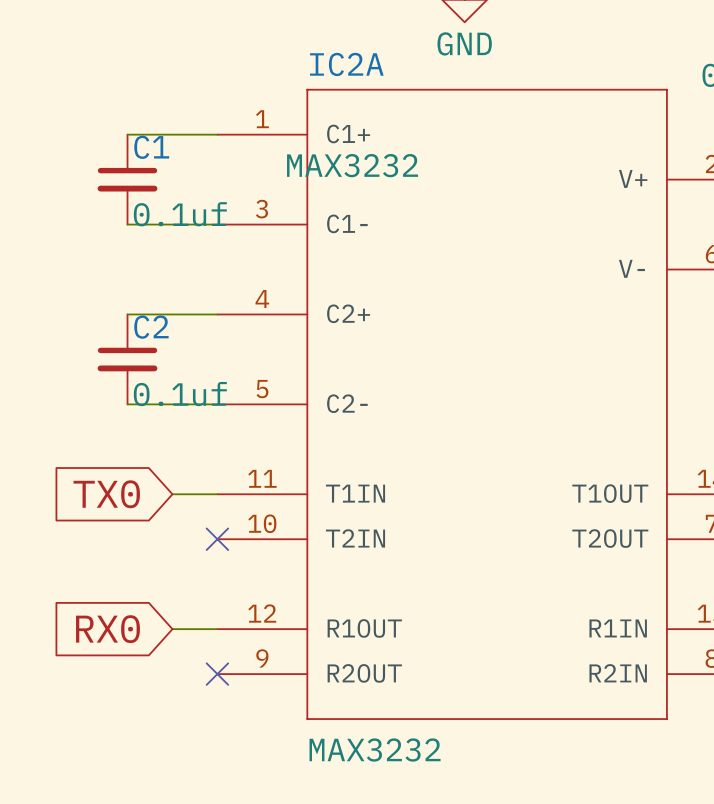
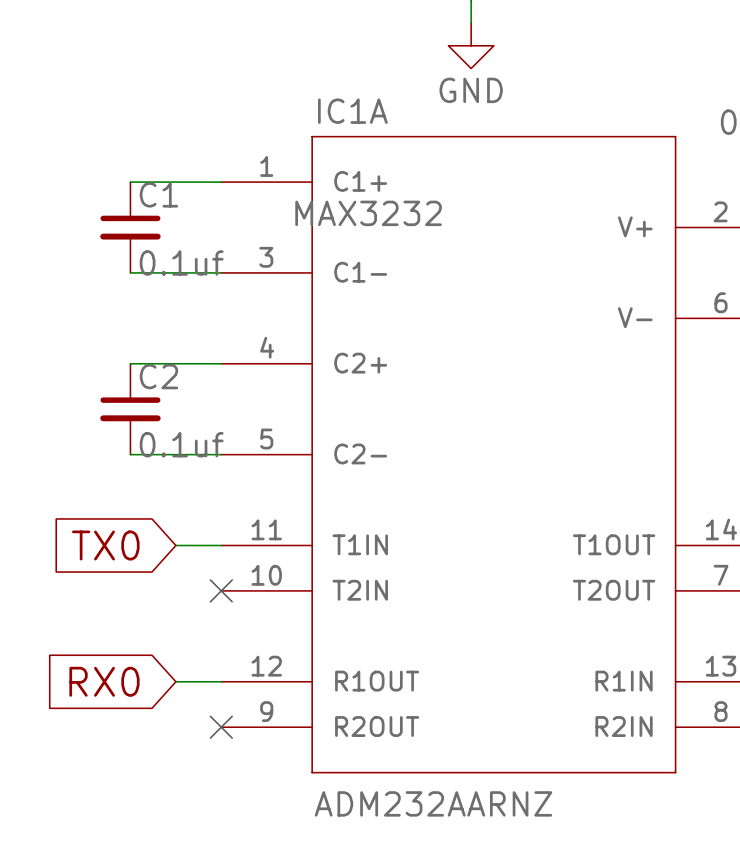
IC2A name: IC2A (346, 64) -> IC1A (352, 111)
IC2A value: MAX3232 (375, 750) -> ADM232AARNZ (433, 803)

